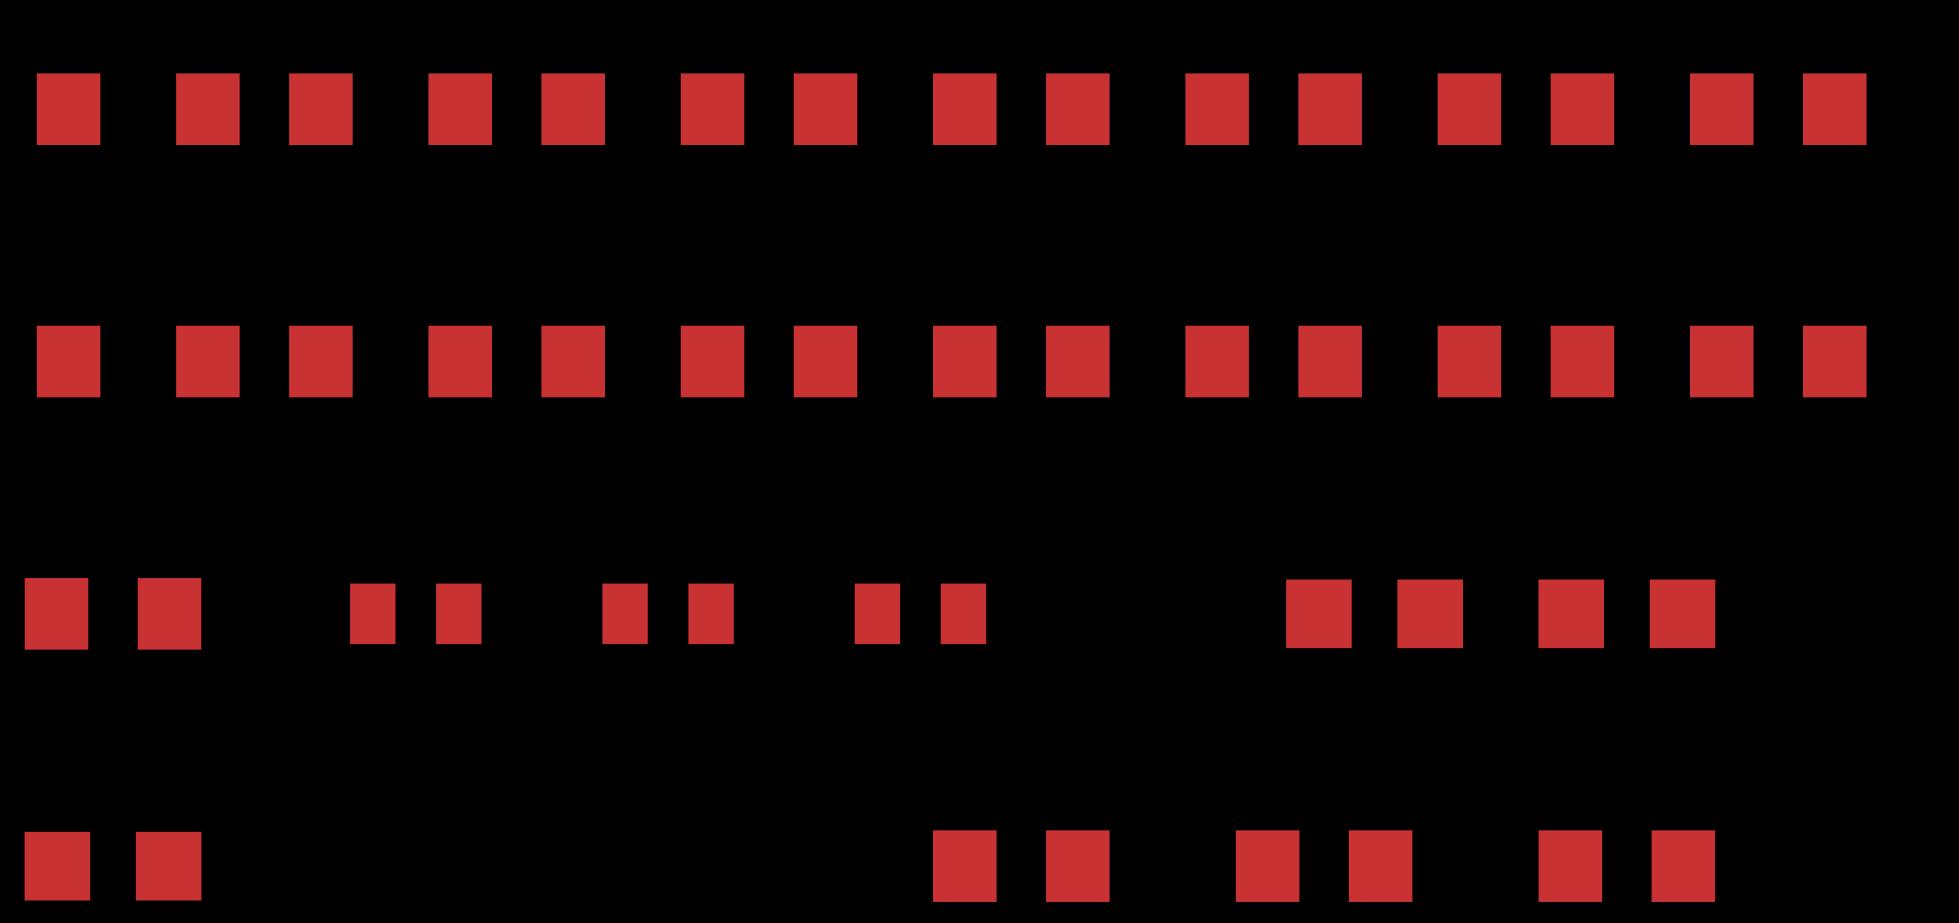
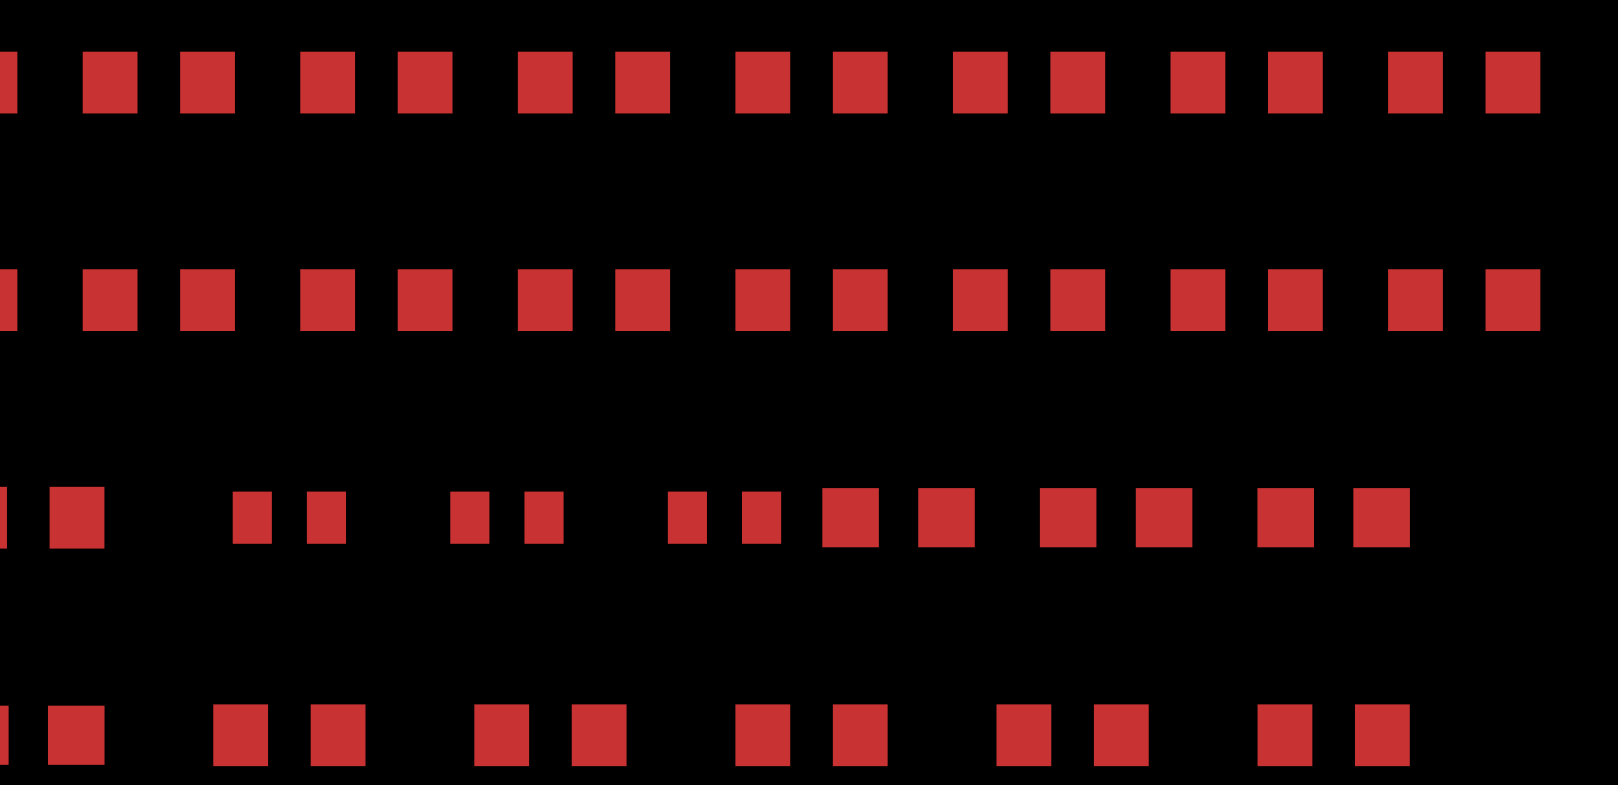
part: none -> (898, 517)
part: none -> (289, 735)
part: none -> (550, 735)

